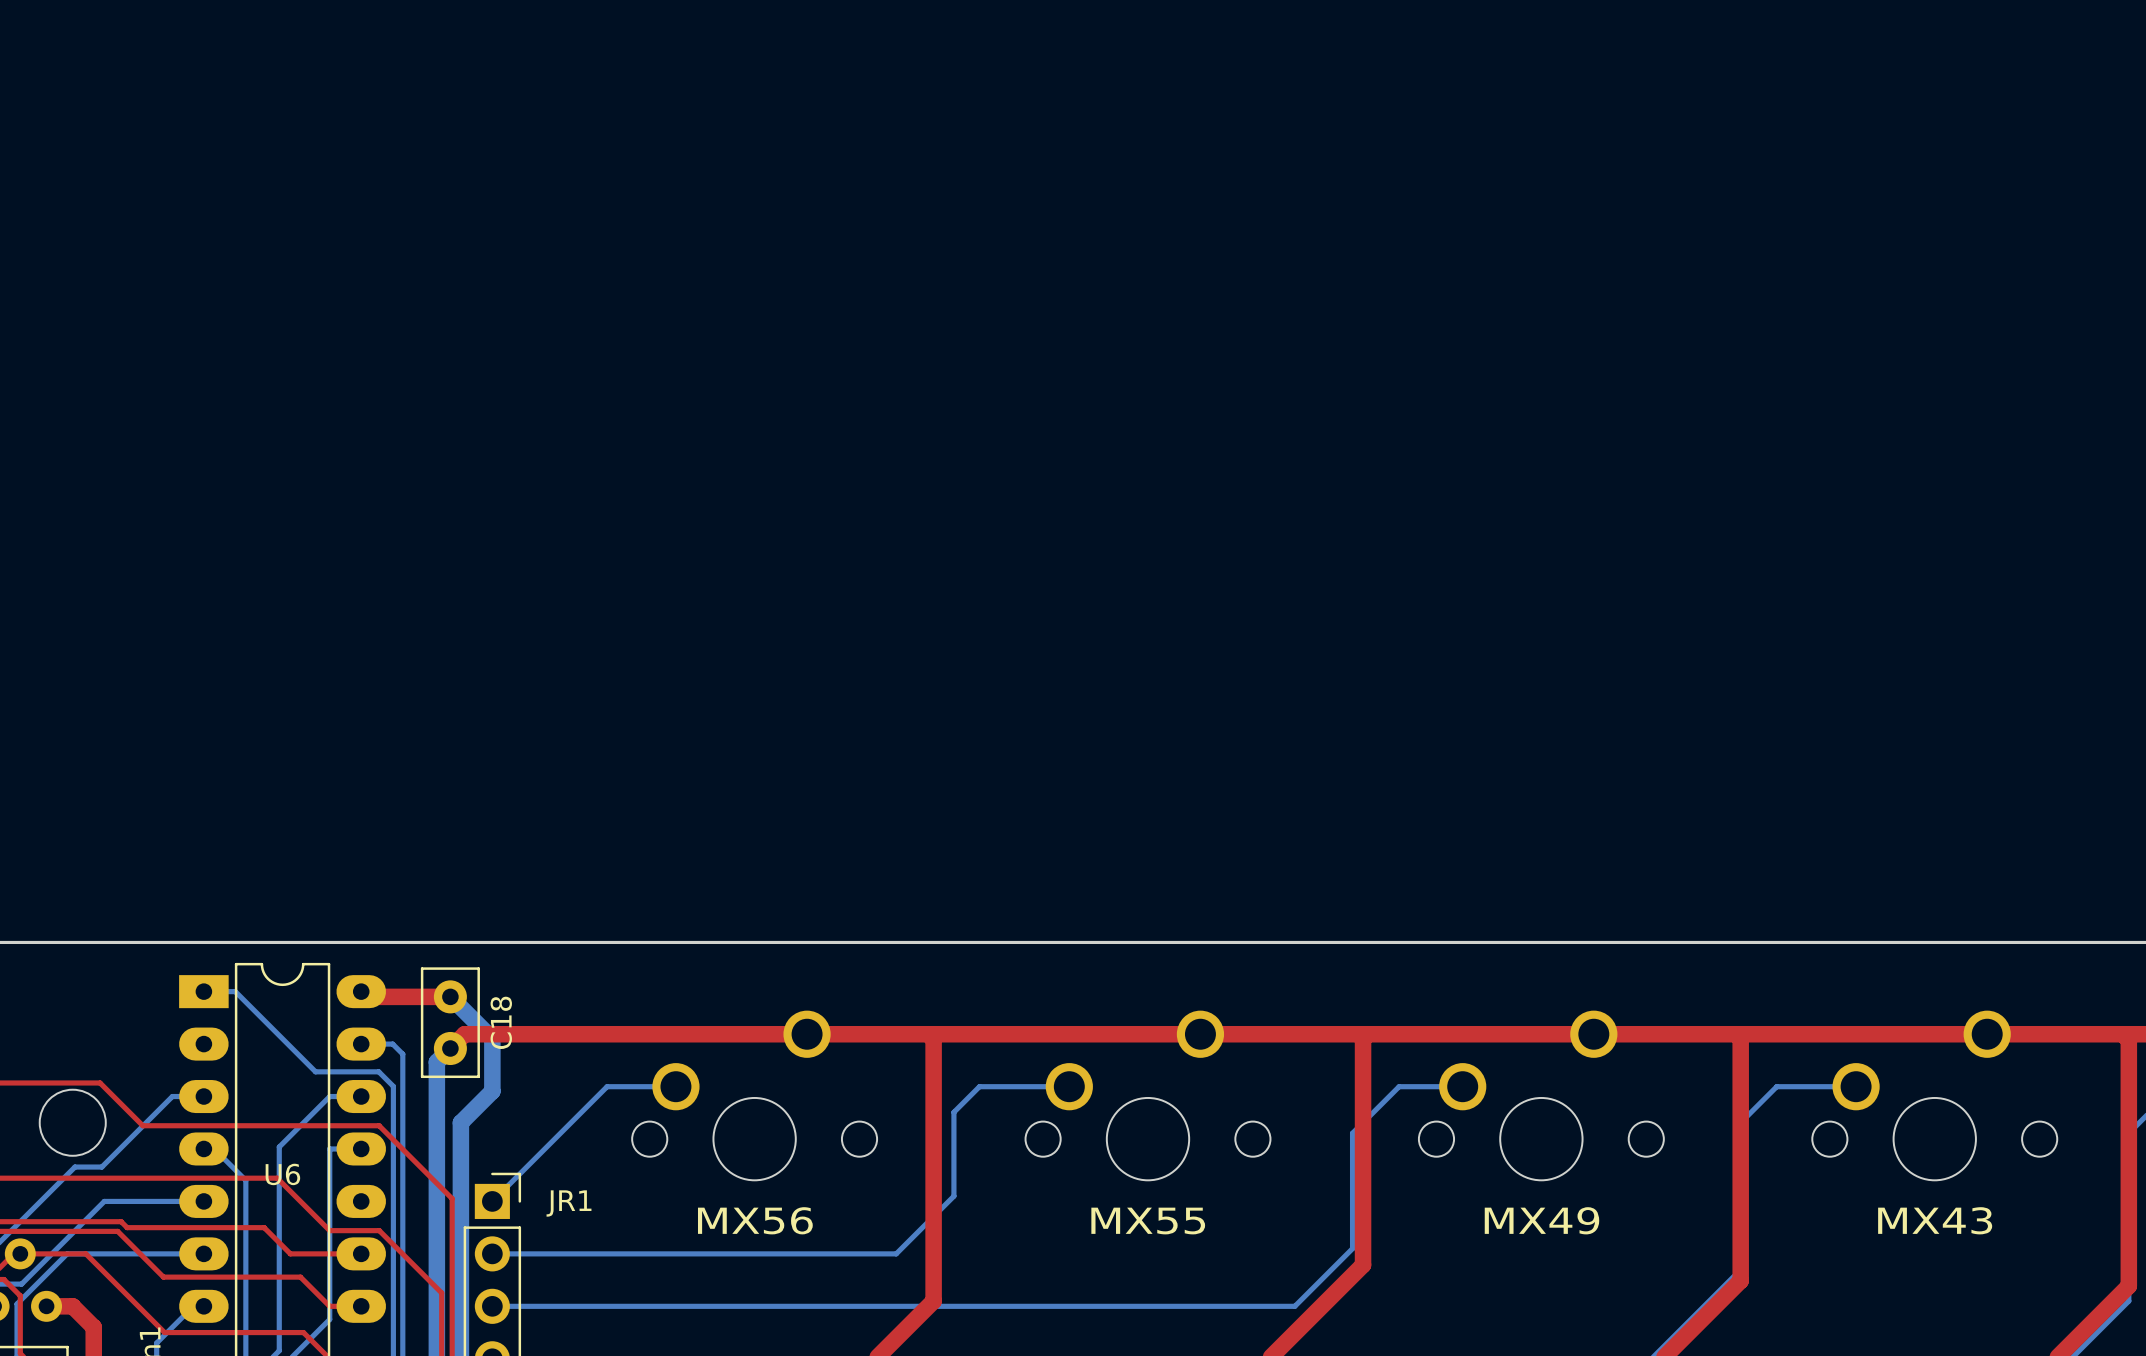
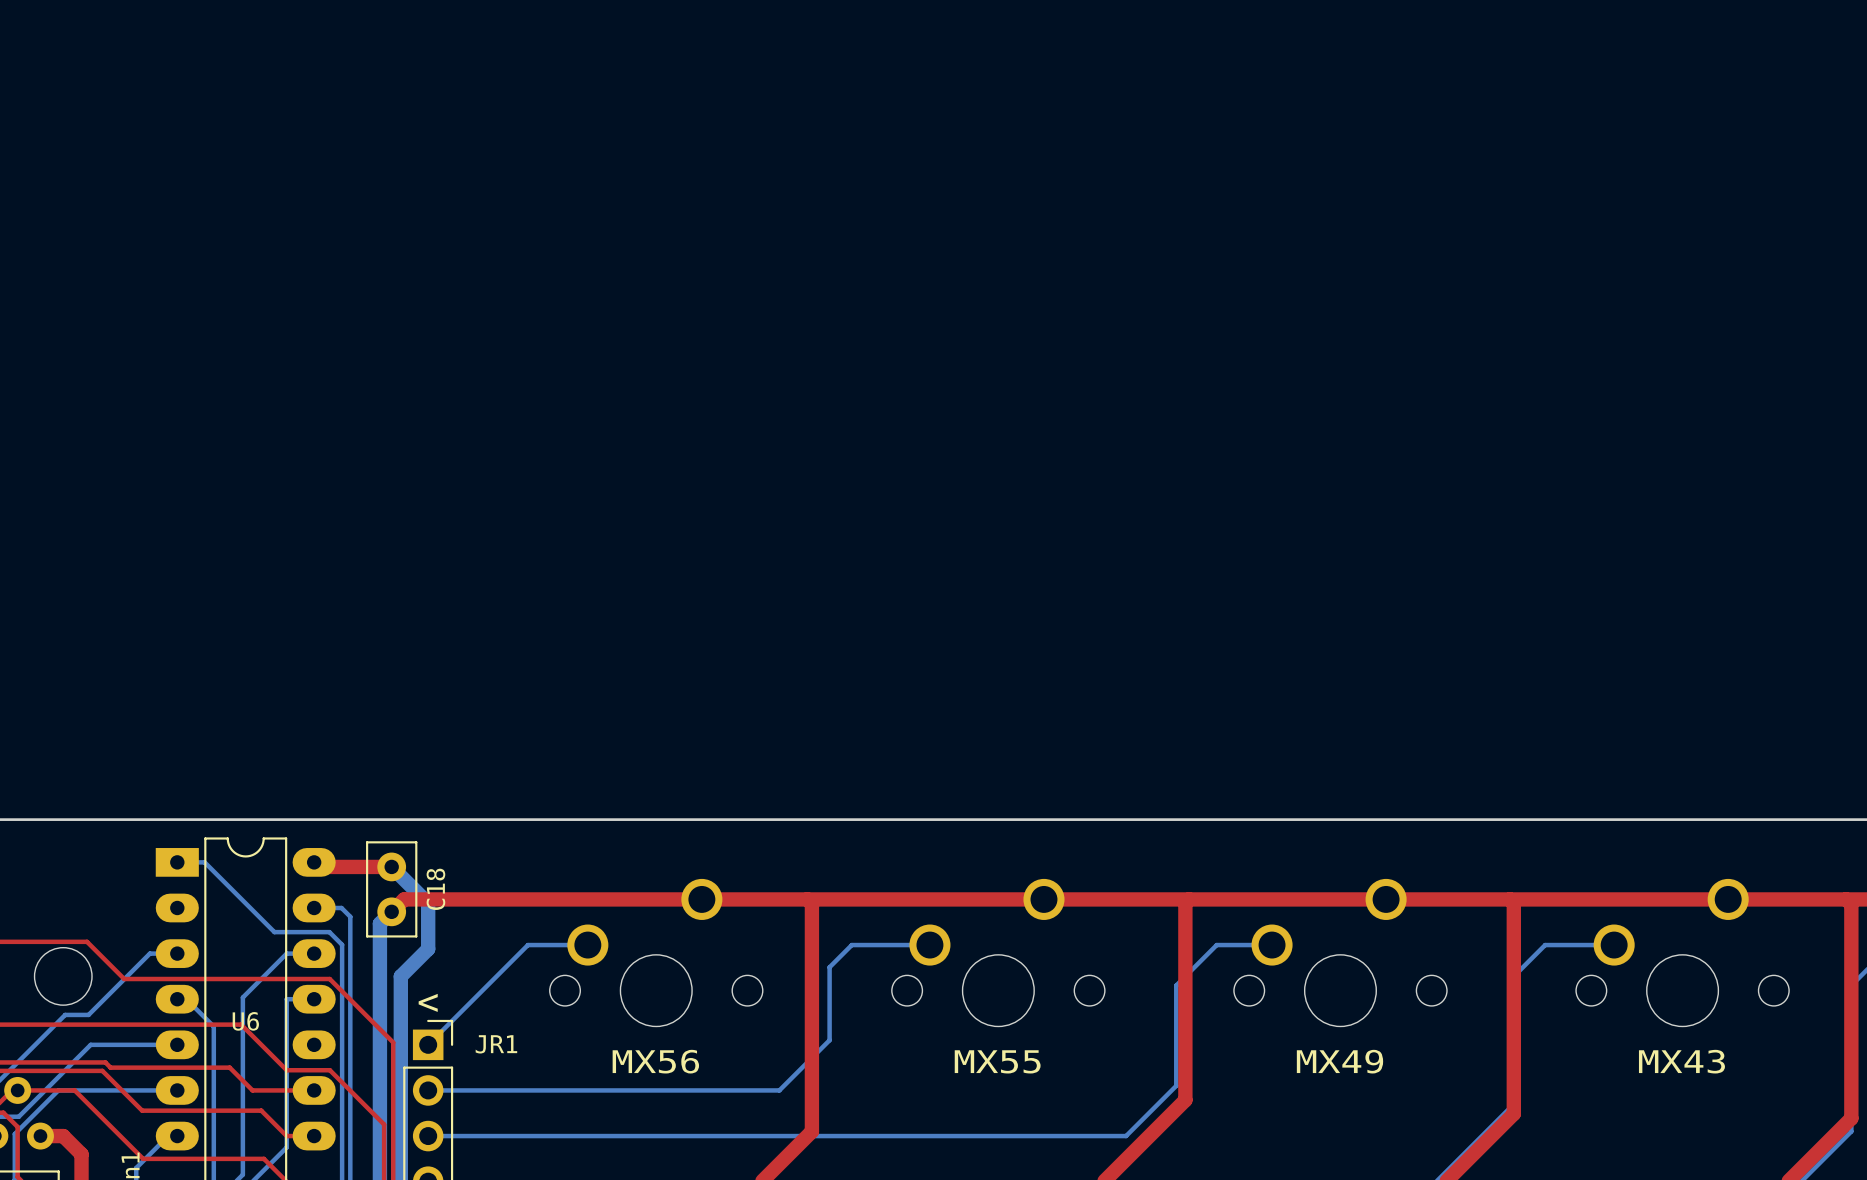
text: none -> > (428, 1002)

